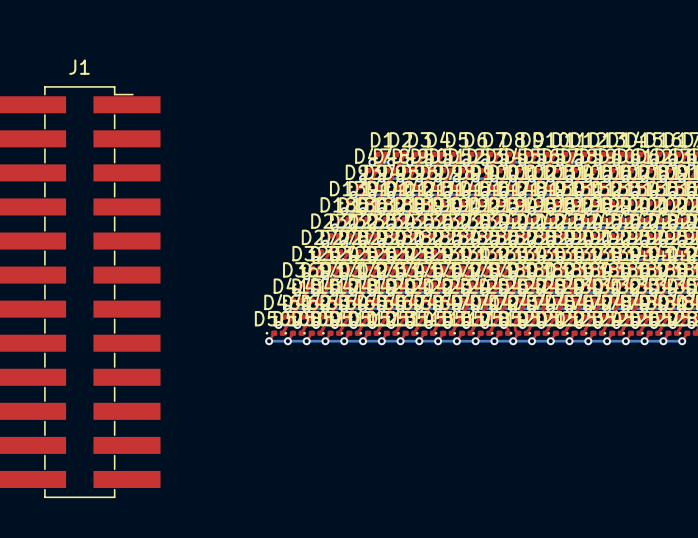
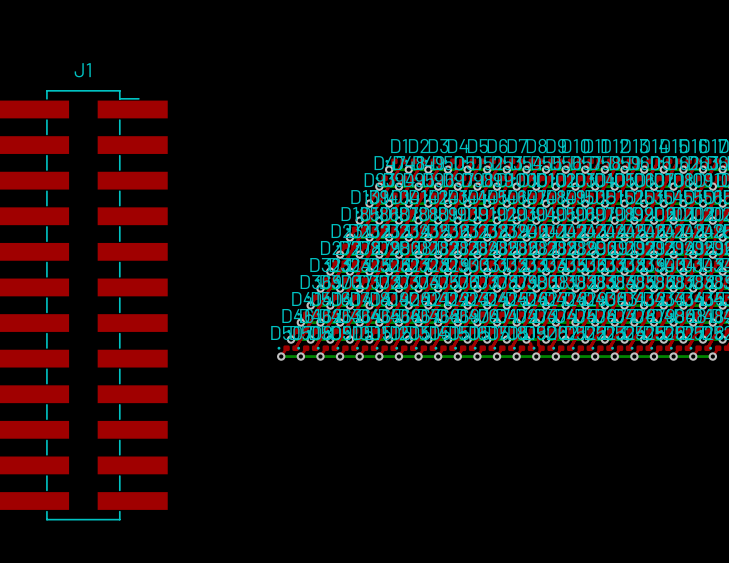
top track: none -> (658, 263) (656, 277) (659, 280)

